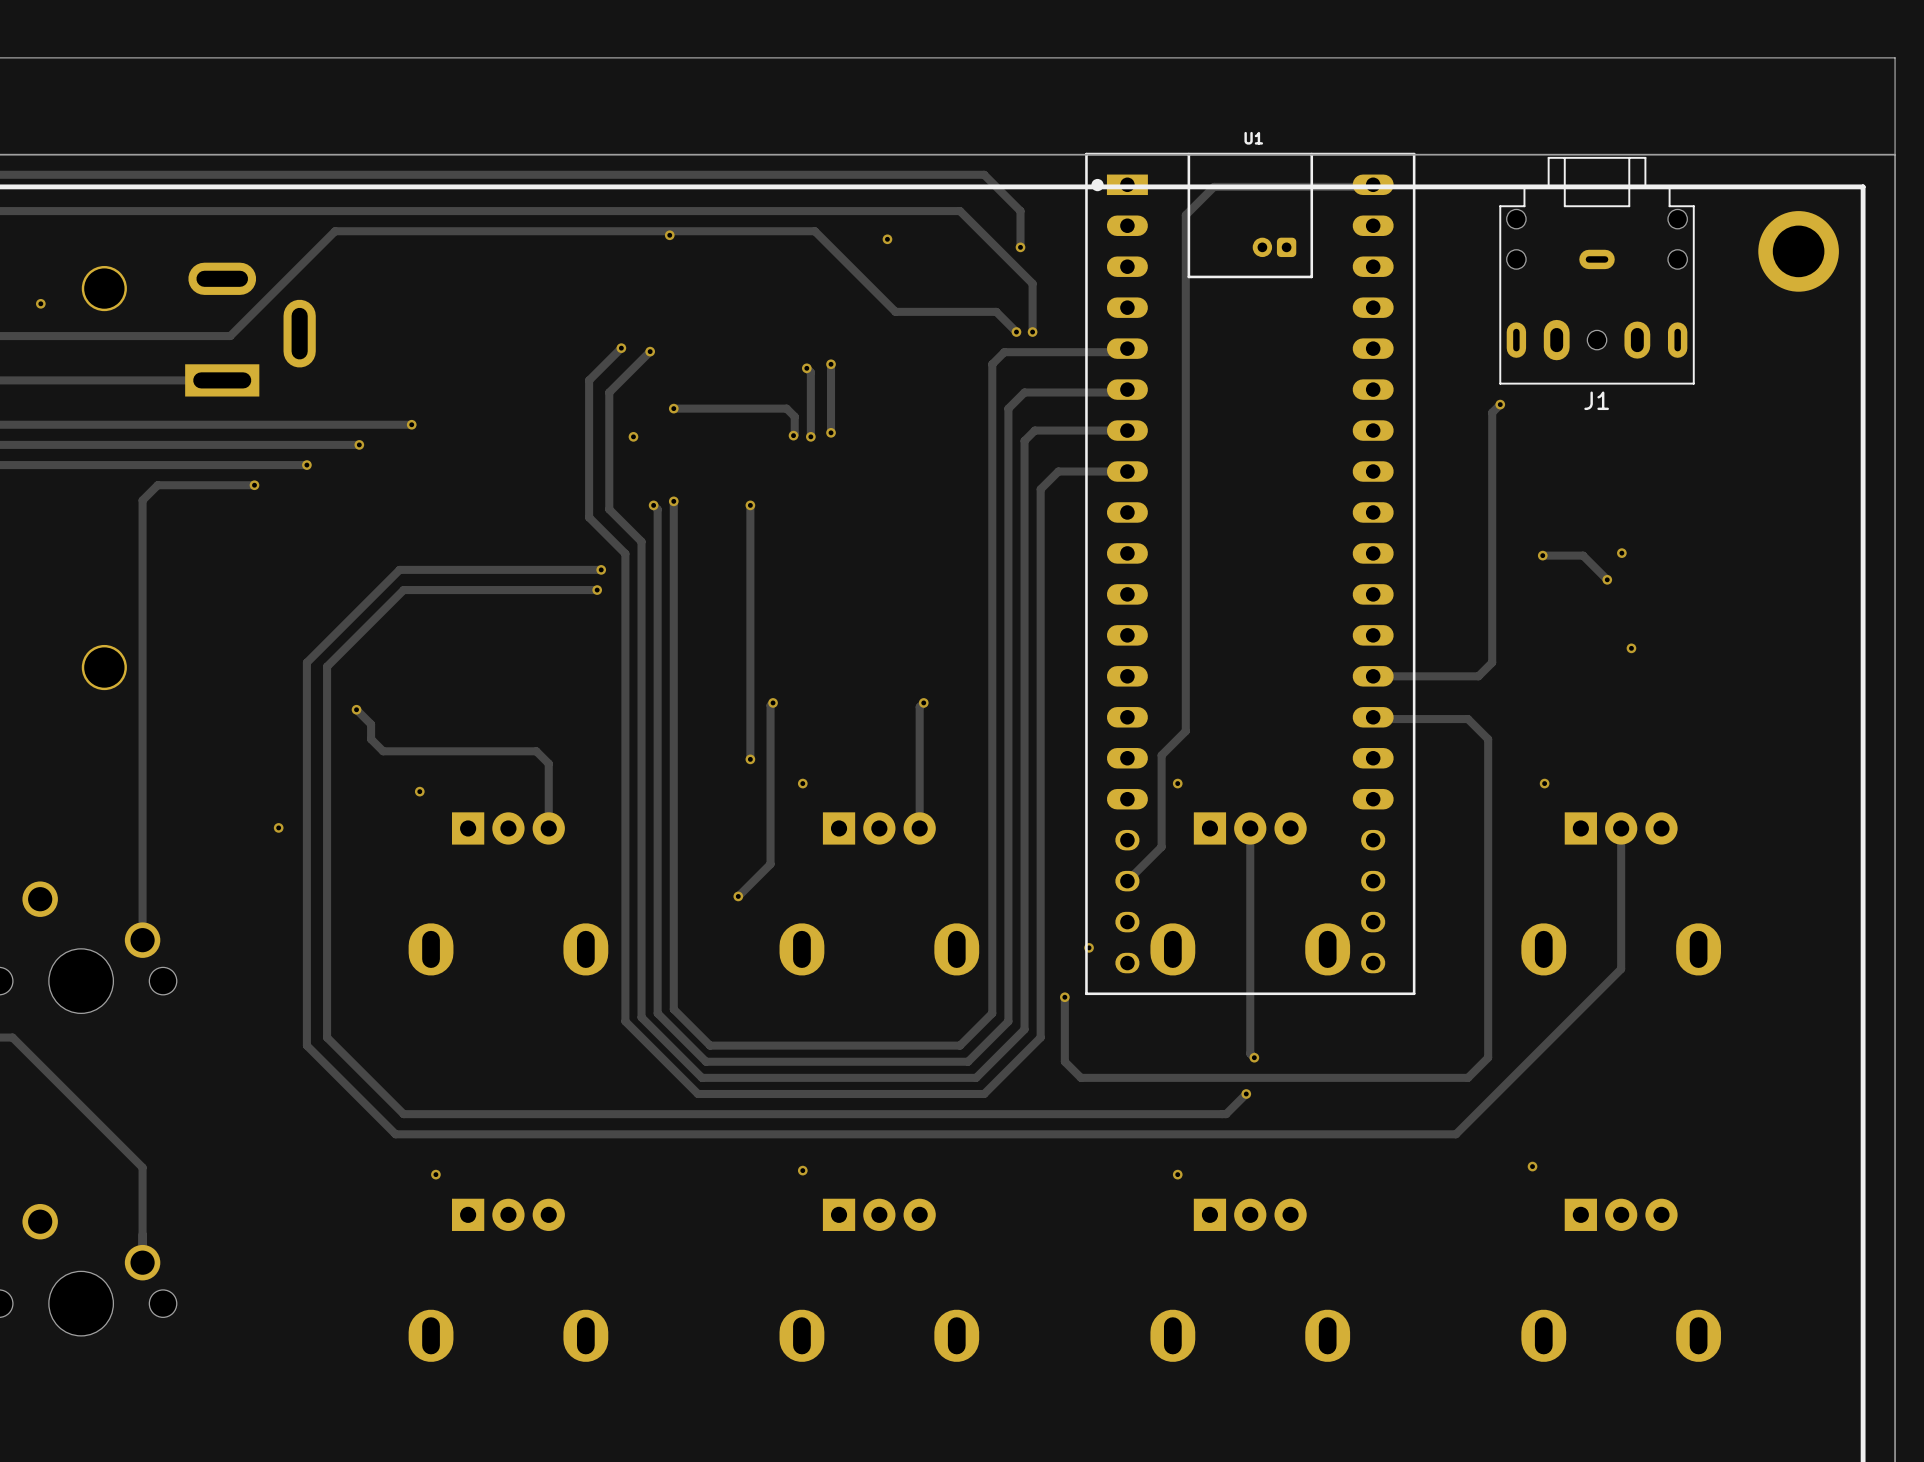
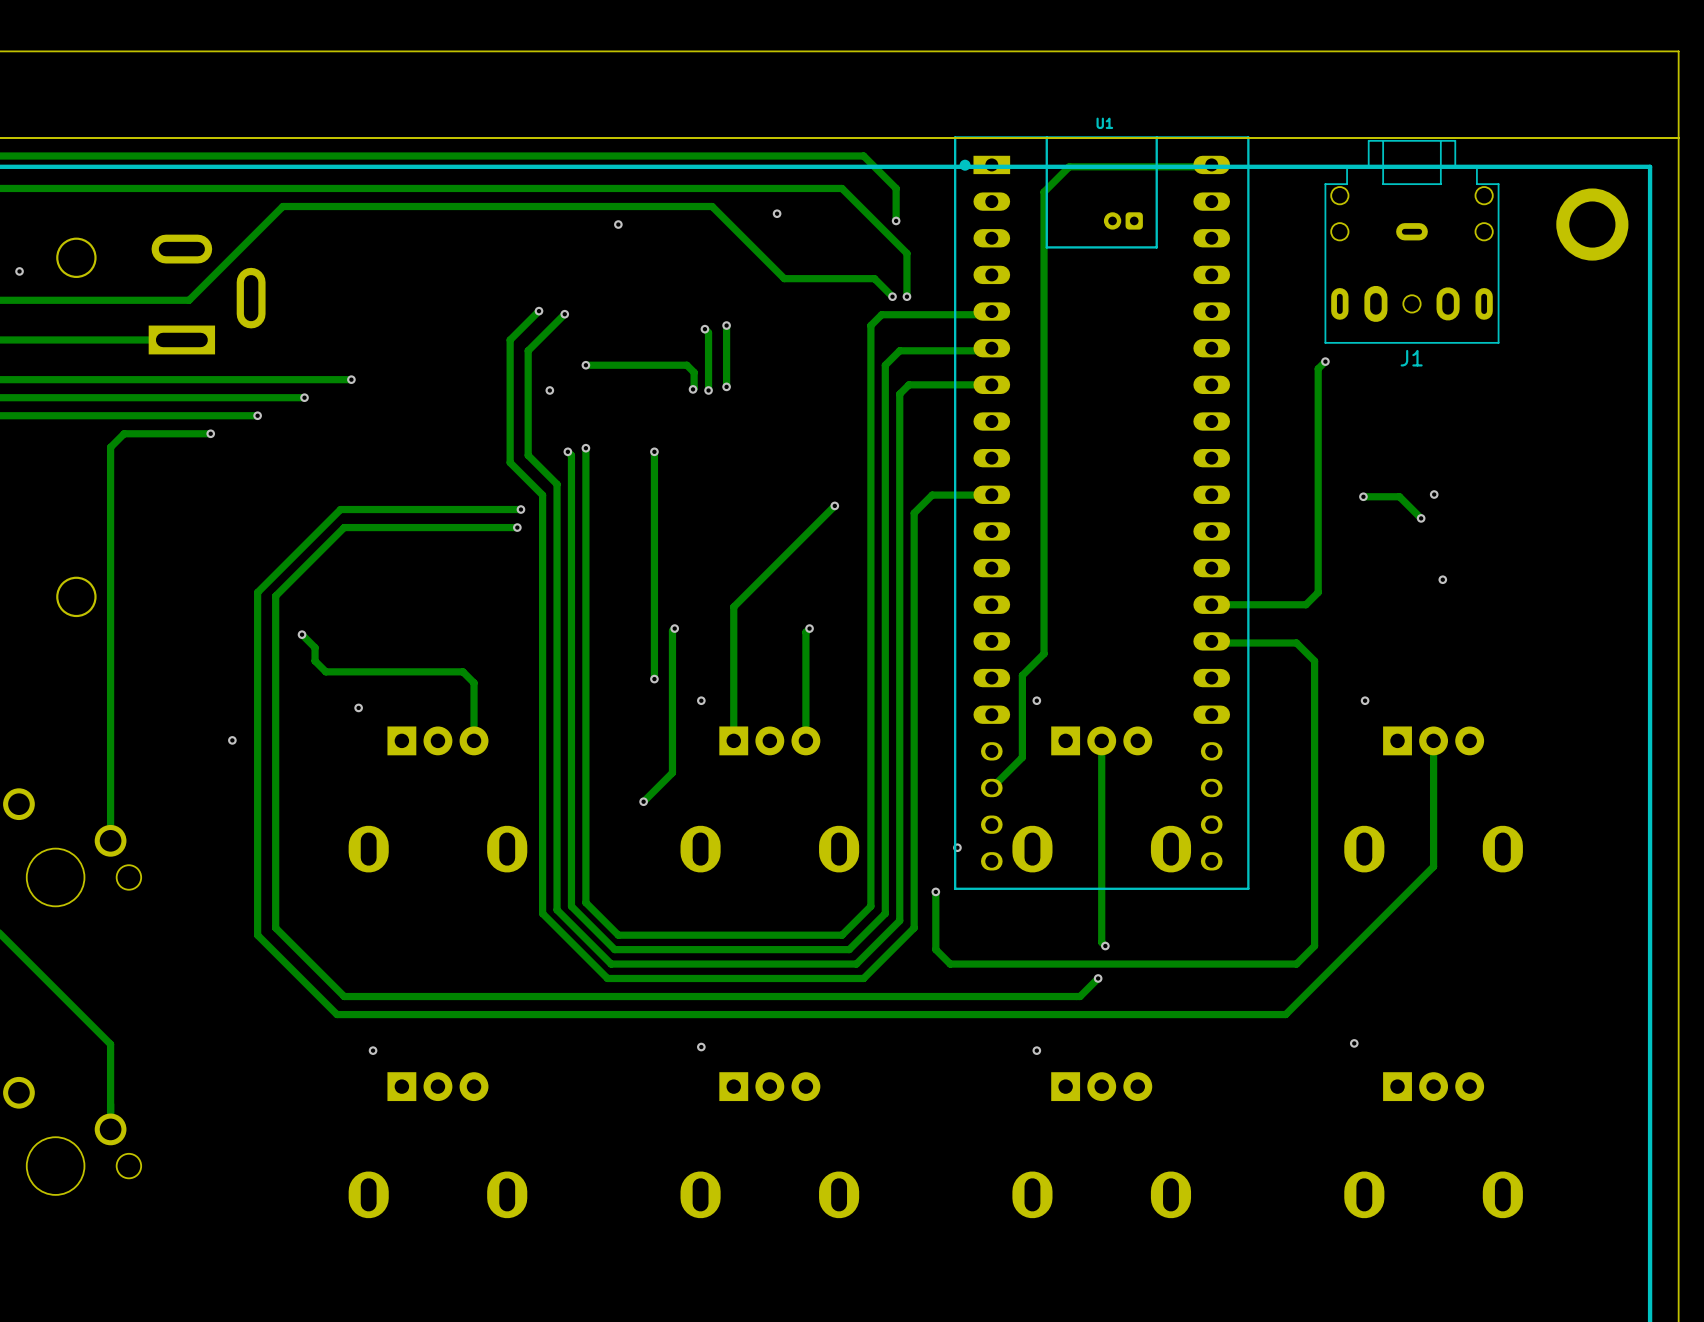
via position: (669, 235) -> (618, 224)
track: (1127, 471) (1058, 471) (1040, 489) (1040, 573) -> (991, 494) (932, 495) (914, 513)
track: none -> (834, 505) (733, 606) (733, 740)
via: none -> (834, 505)

